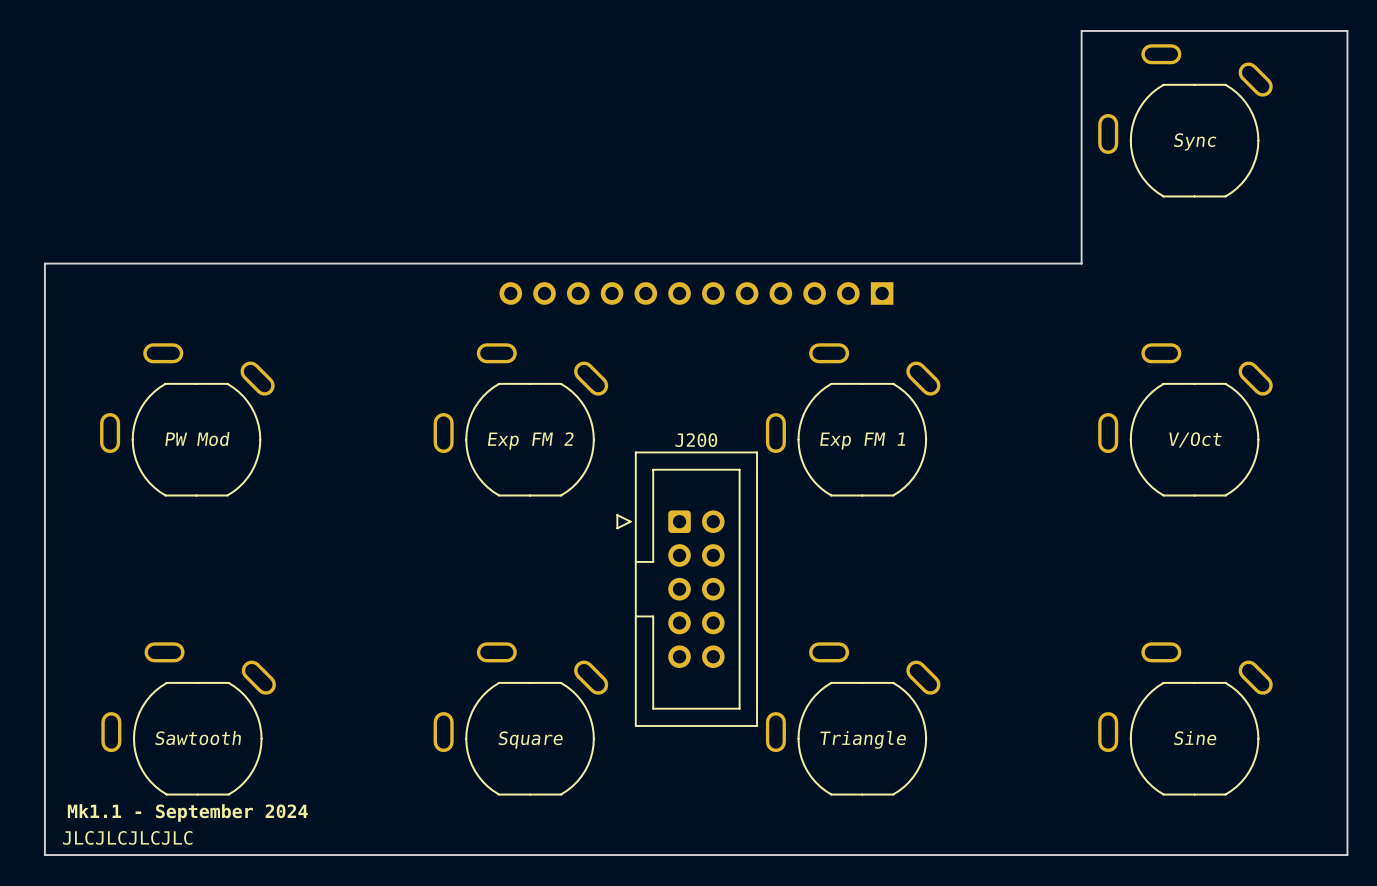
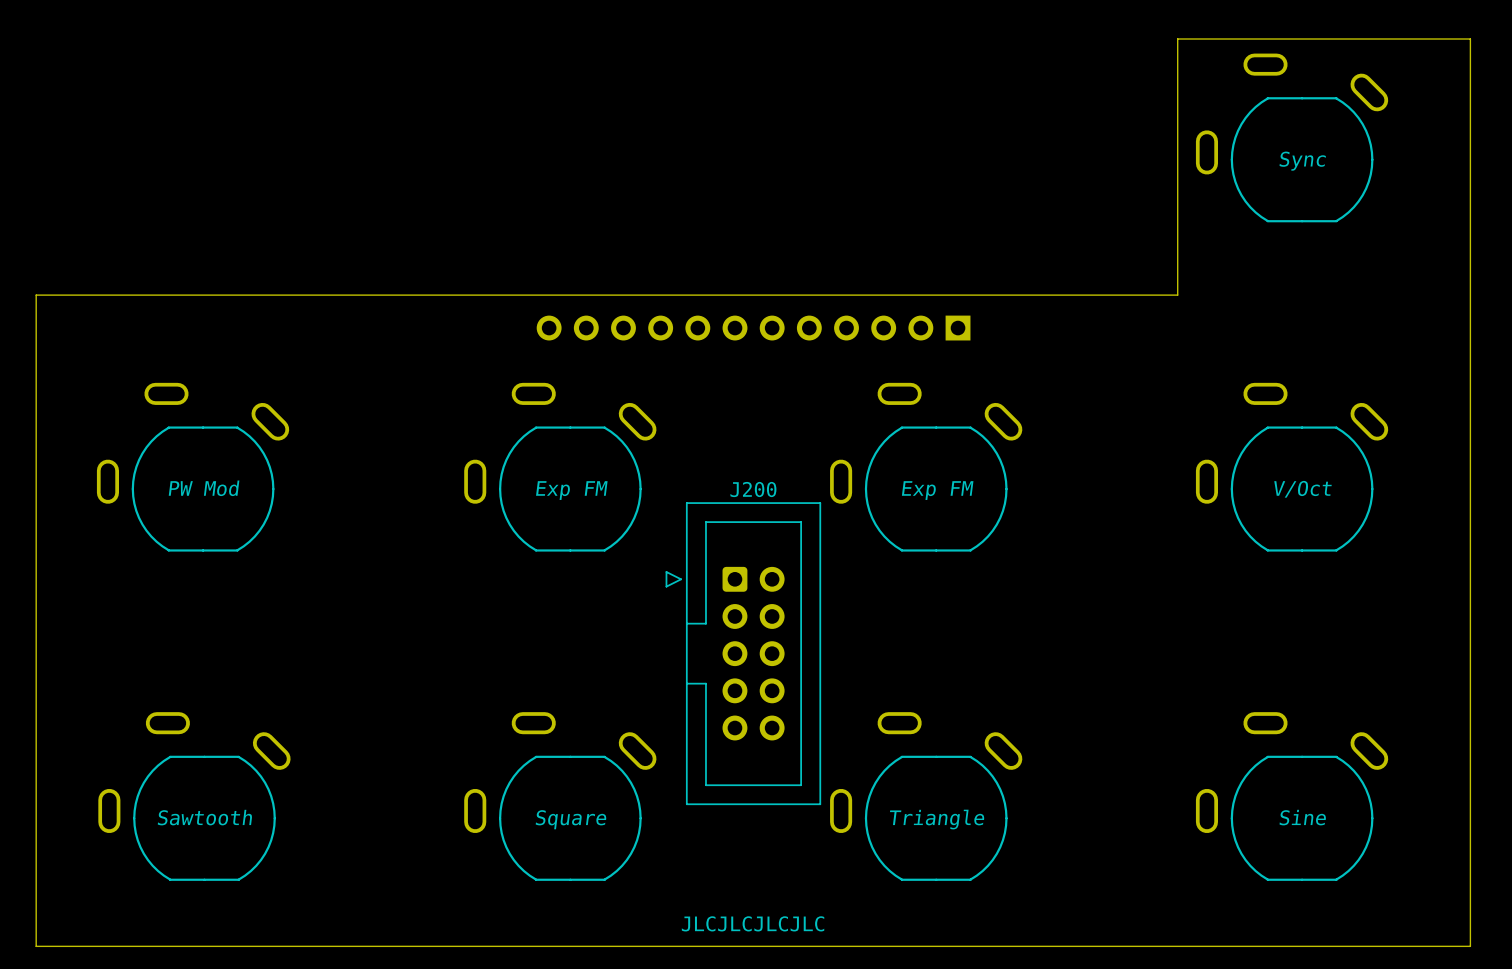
part text: Exp FM 2 (530, 440) -> Exp FM (571, 490)
part text: Exp FM 1 (862, 441) -> Exp FM (937, 490)
text: Mk1.1 - September 2024 (187, 812) -> none
text: none -> JLCJLCJLCJLC (753, 923)
text: JLCJLCJLCJLC (127, 837) -> none

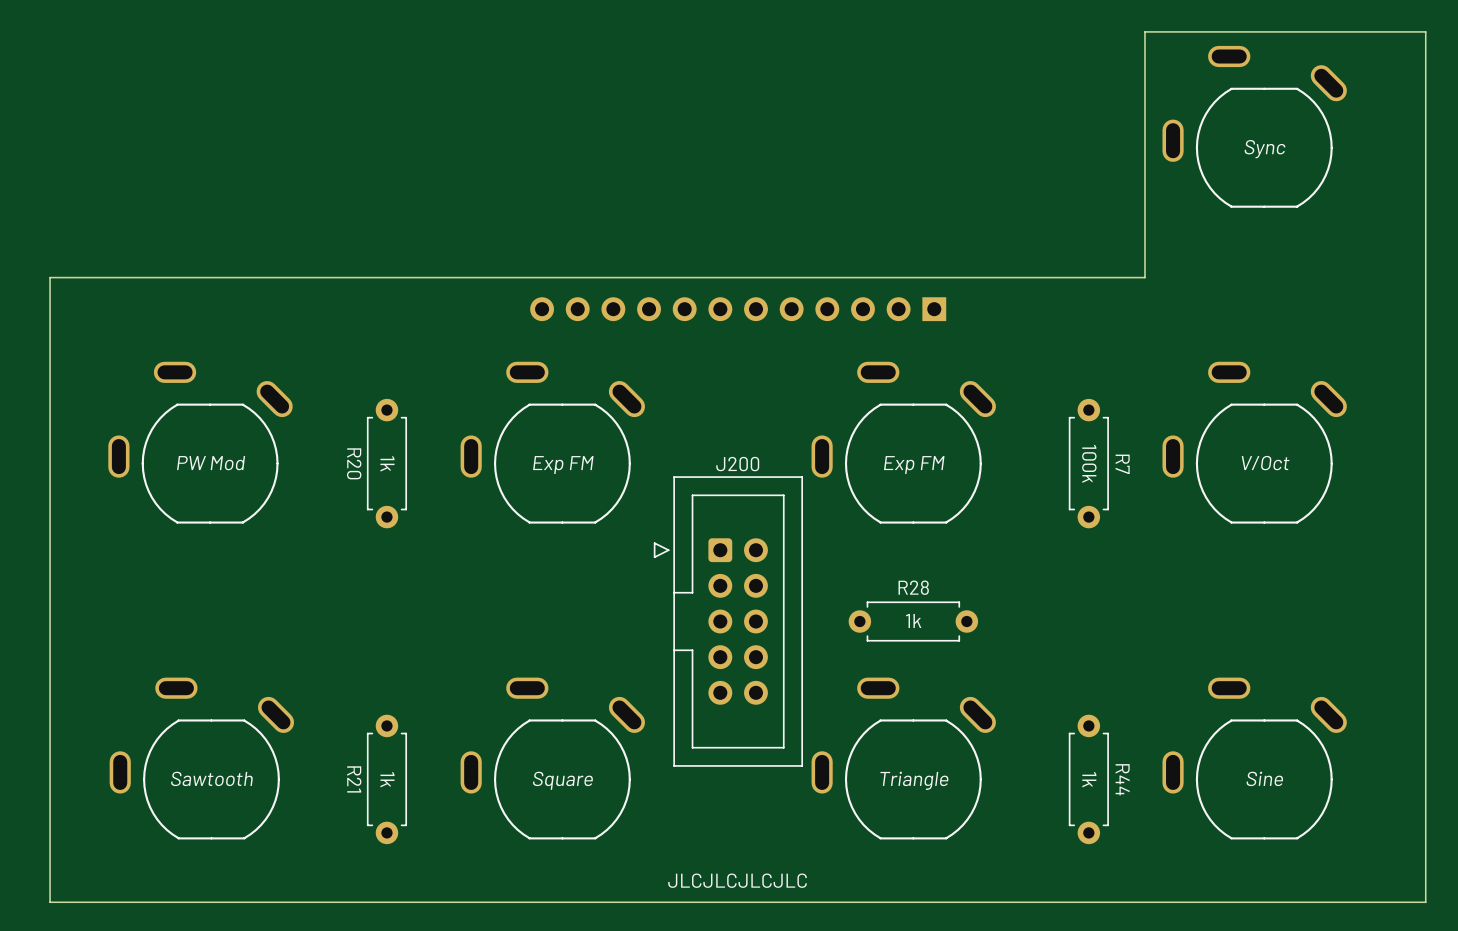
R20: none -> 1k (386, 463)
R7: none -> 100k (1088, 463)
R28: none -> 1k (913, 621)
R21: none -> 1k (386, 779)
R44: none -> 1k (1088, 779)

